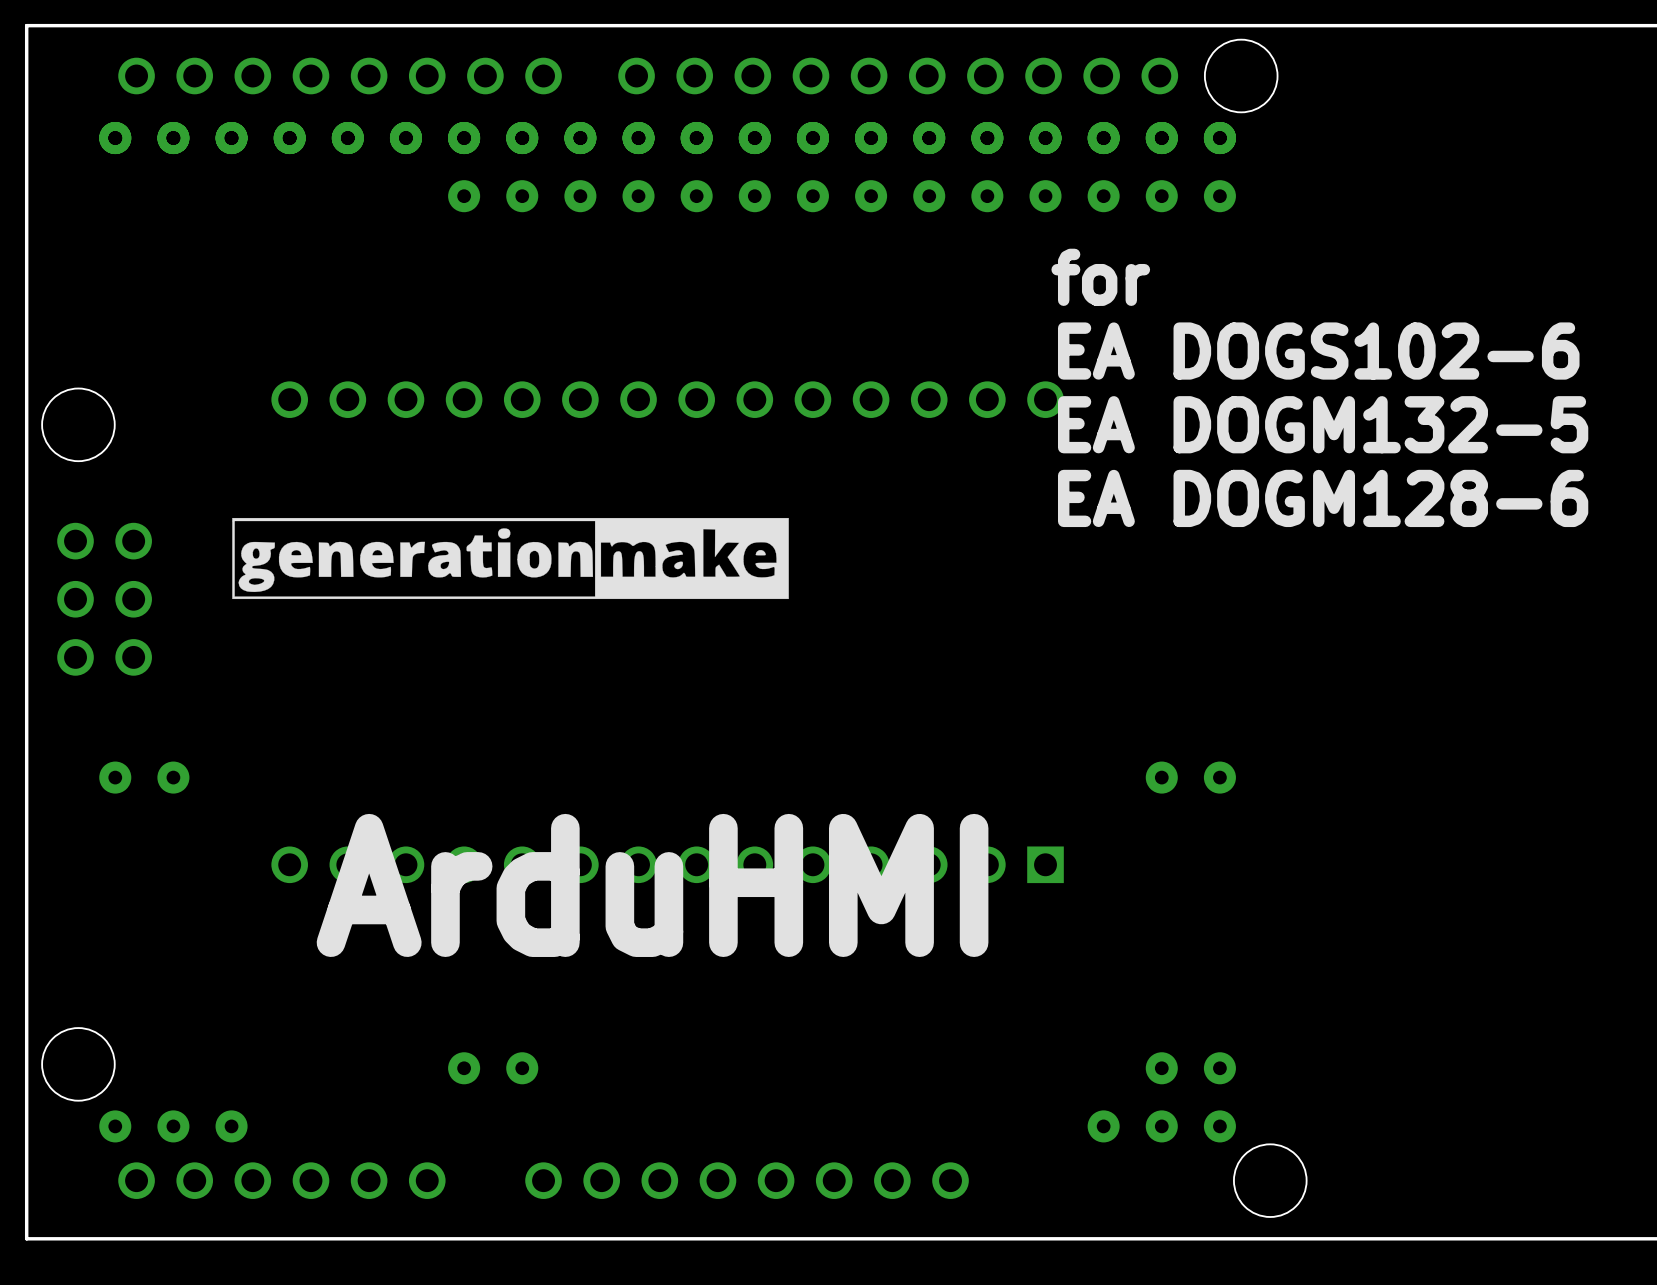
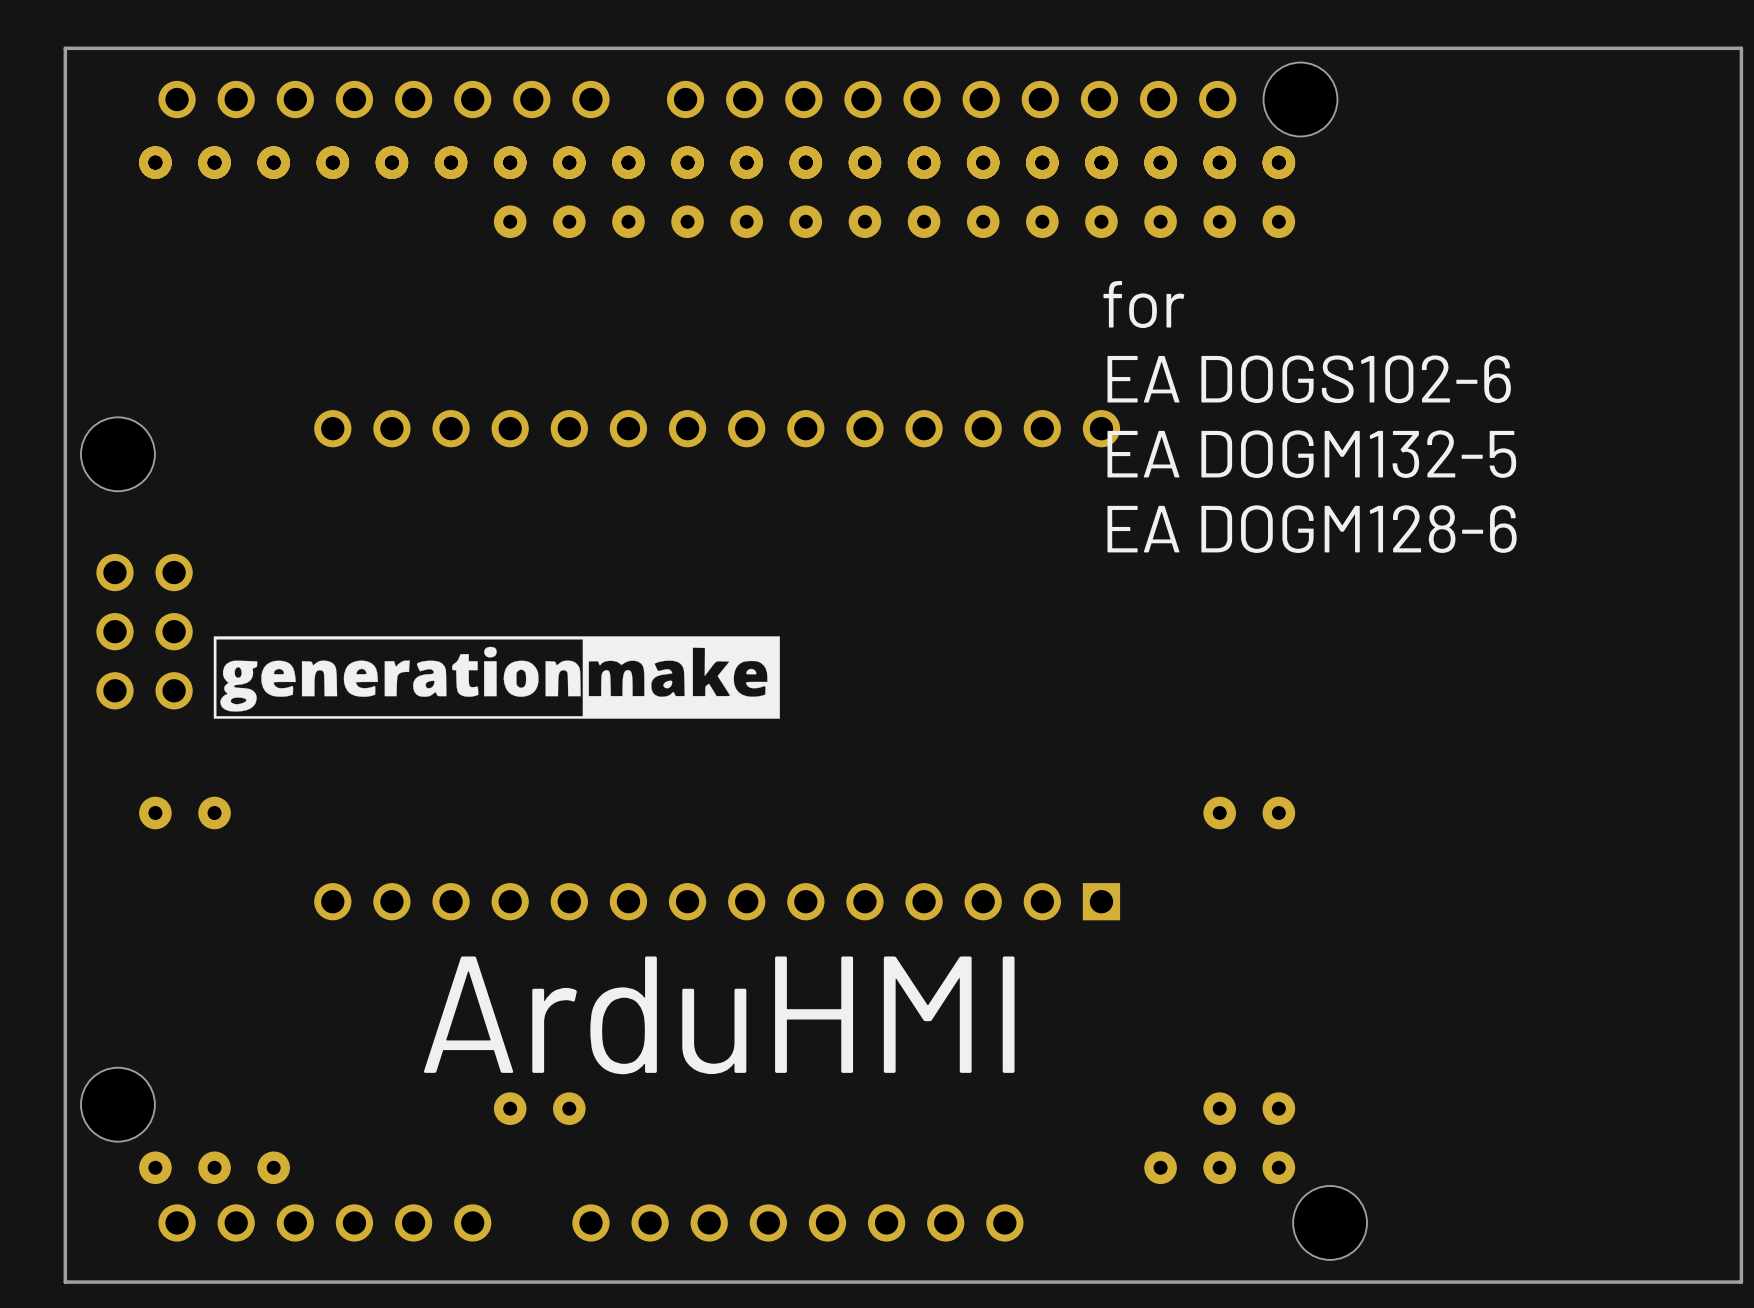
drawing position: (510, 558) -> (496, 677)
text position: ArduHMI (652, 885) -> ArduHMI (719, 1015)

